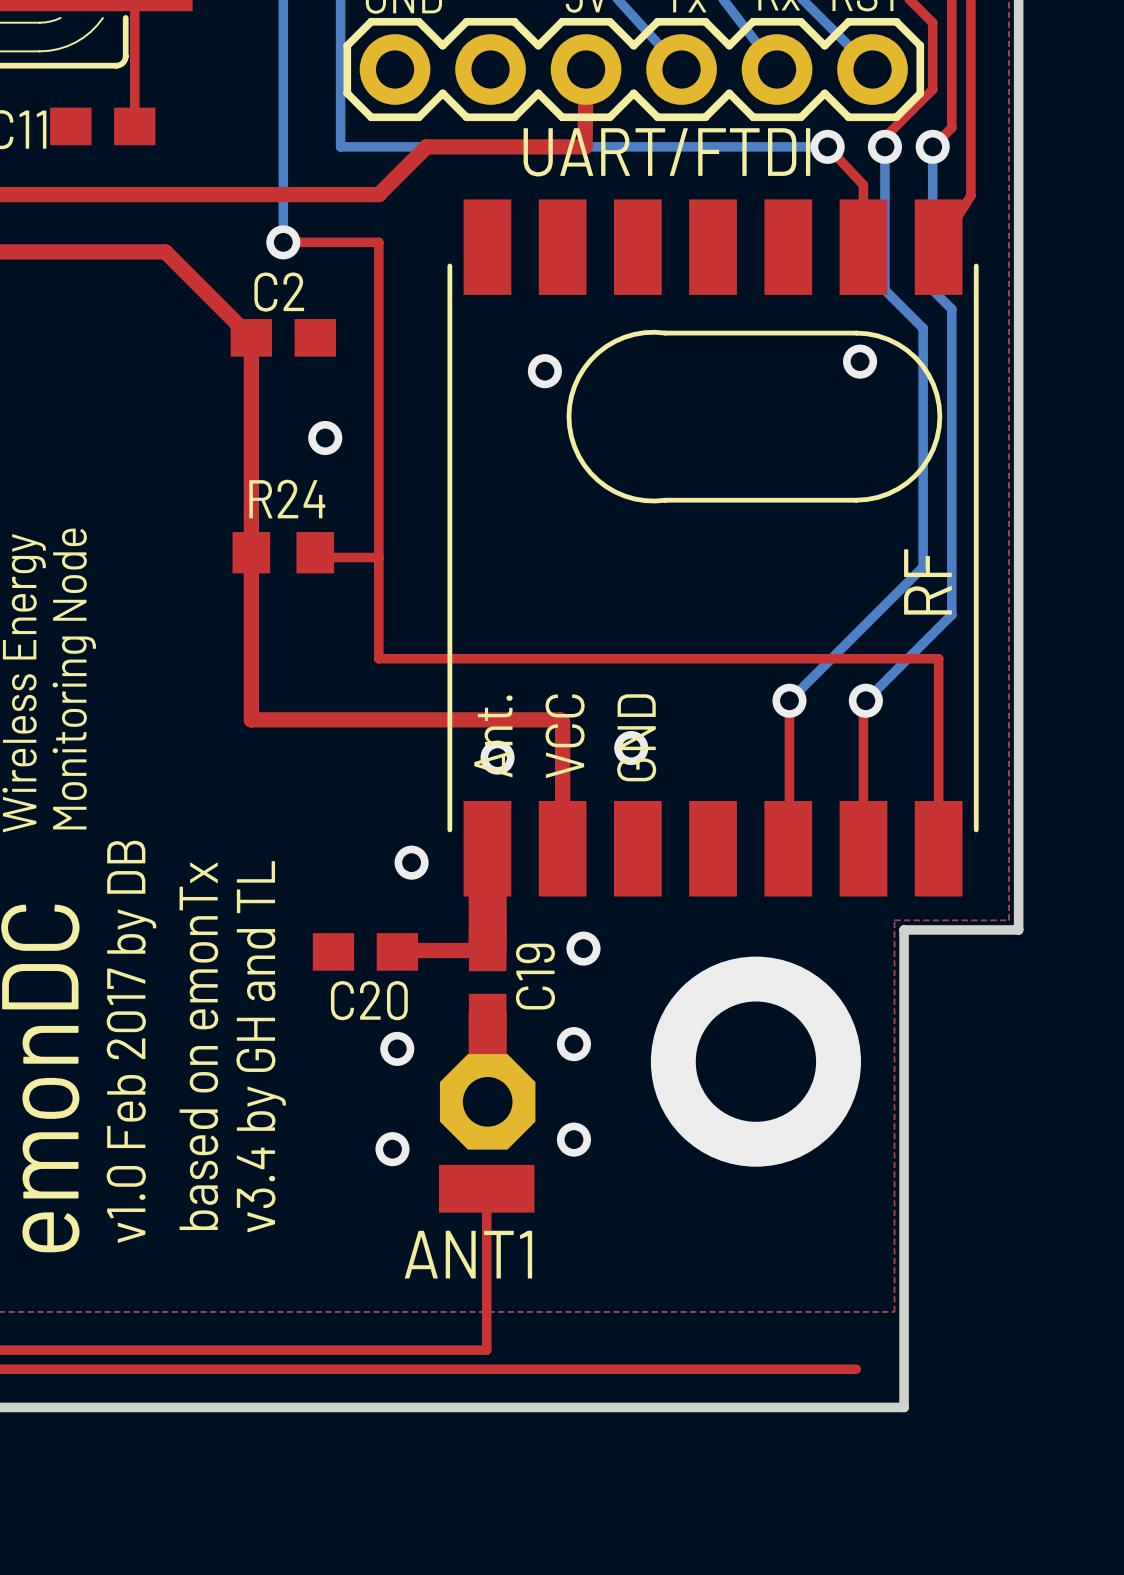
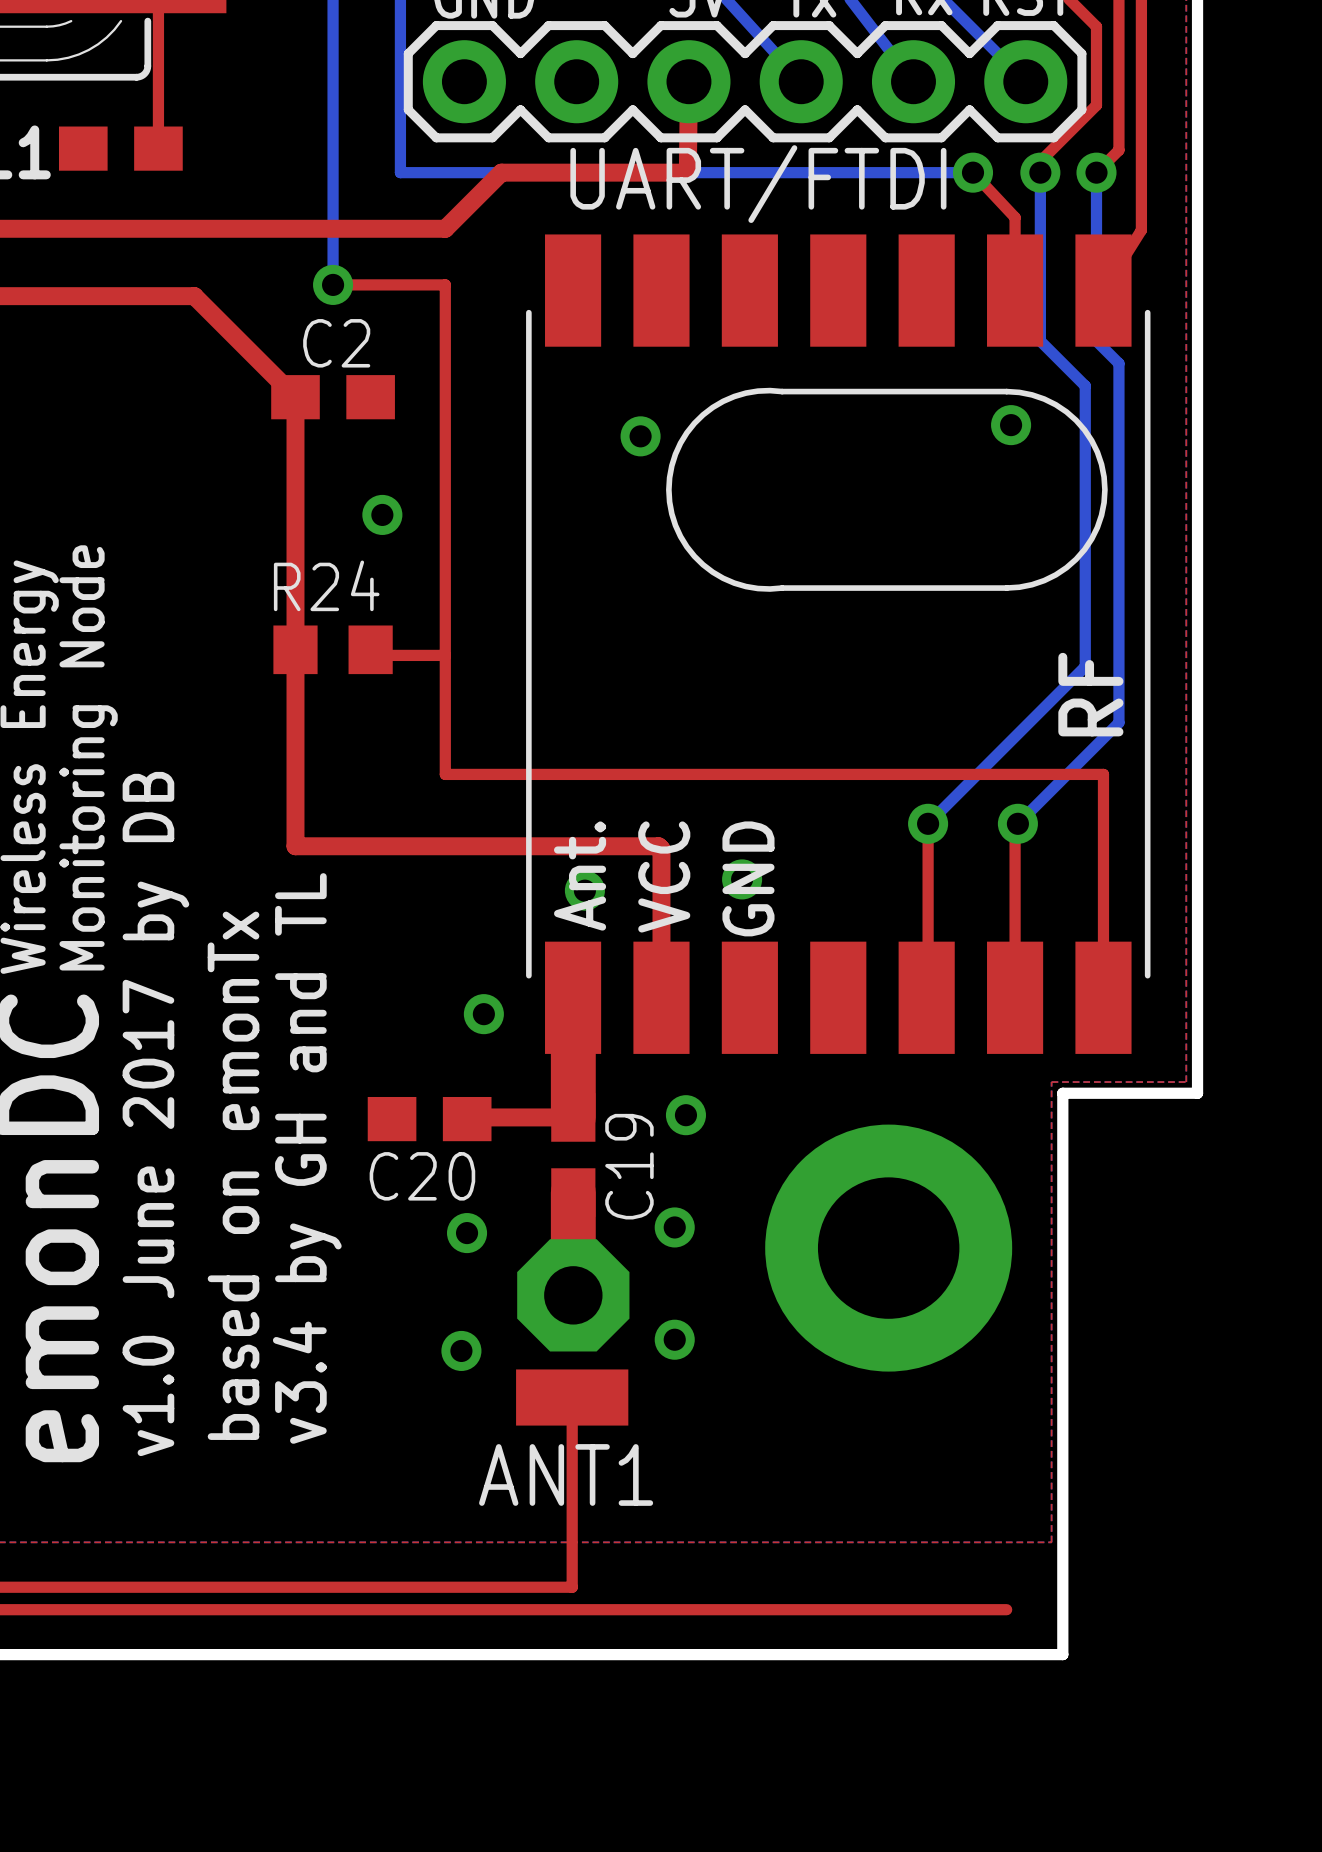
text: v1.0 Feb 2017 by DB (131, 1041) -> v1.0 June 2017 by DB (155, 1114)

